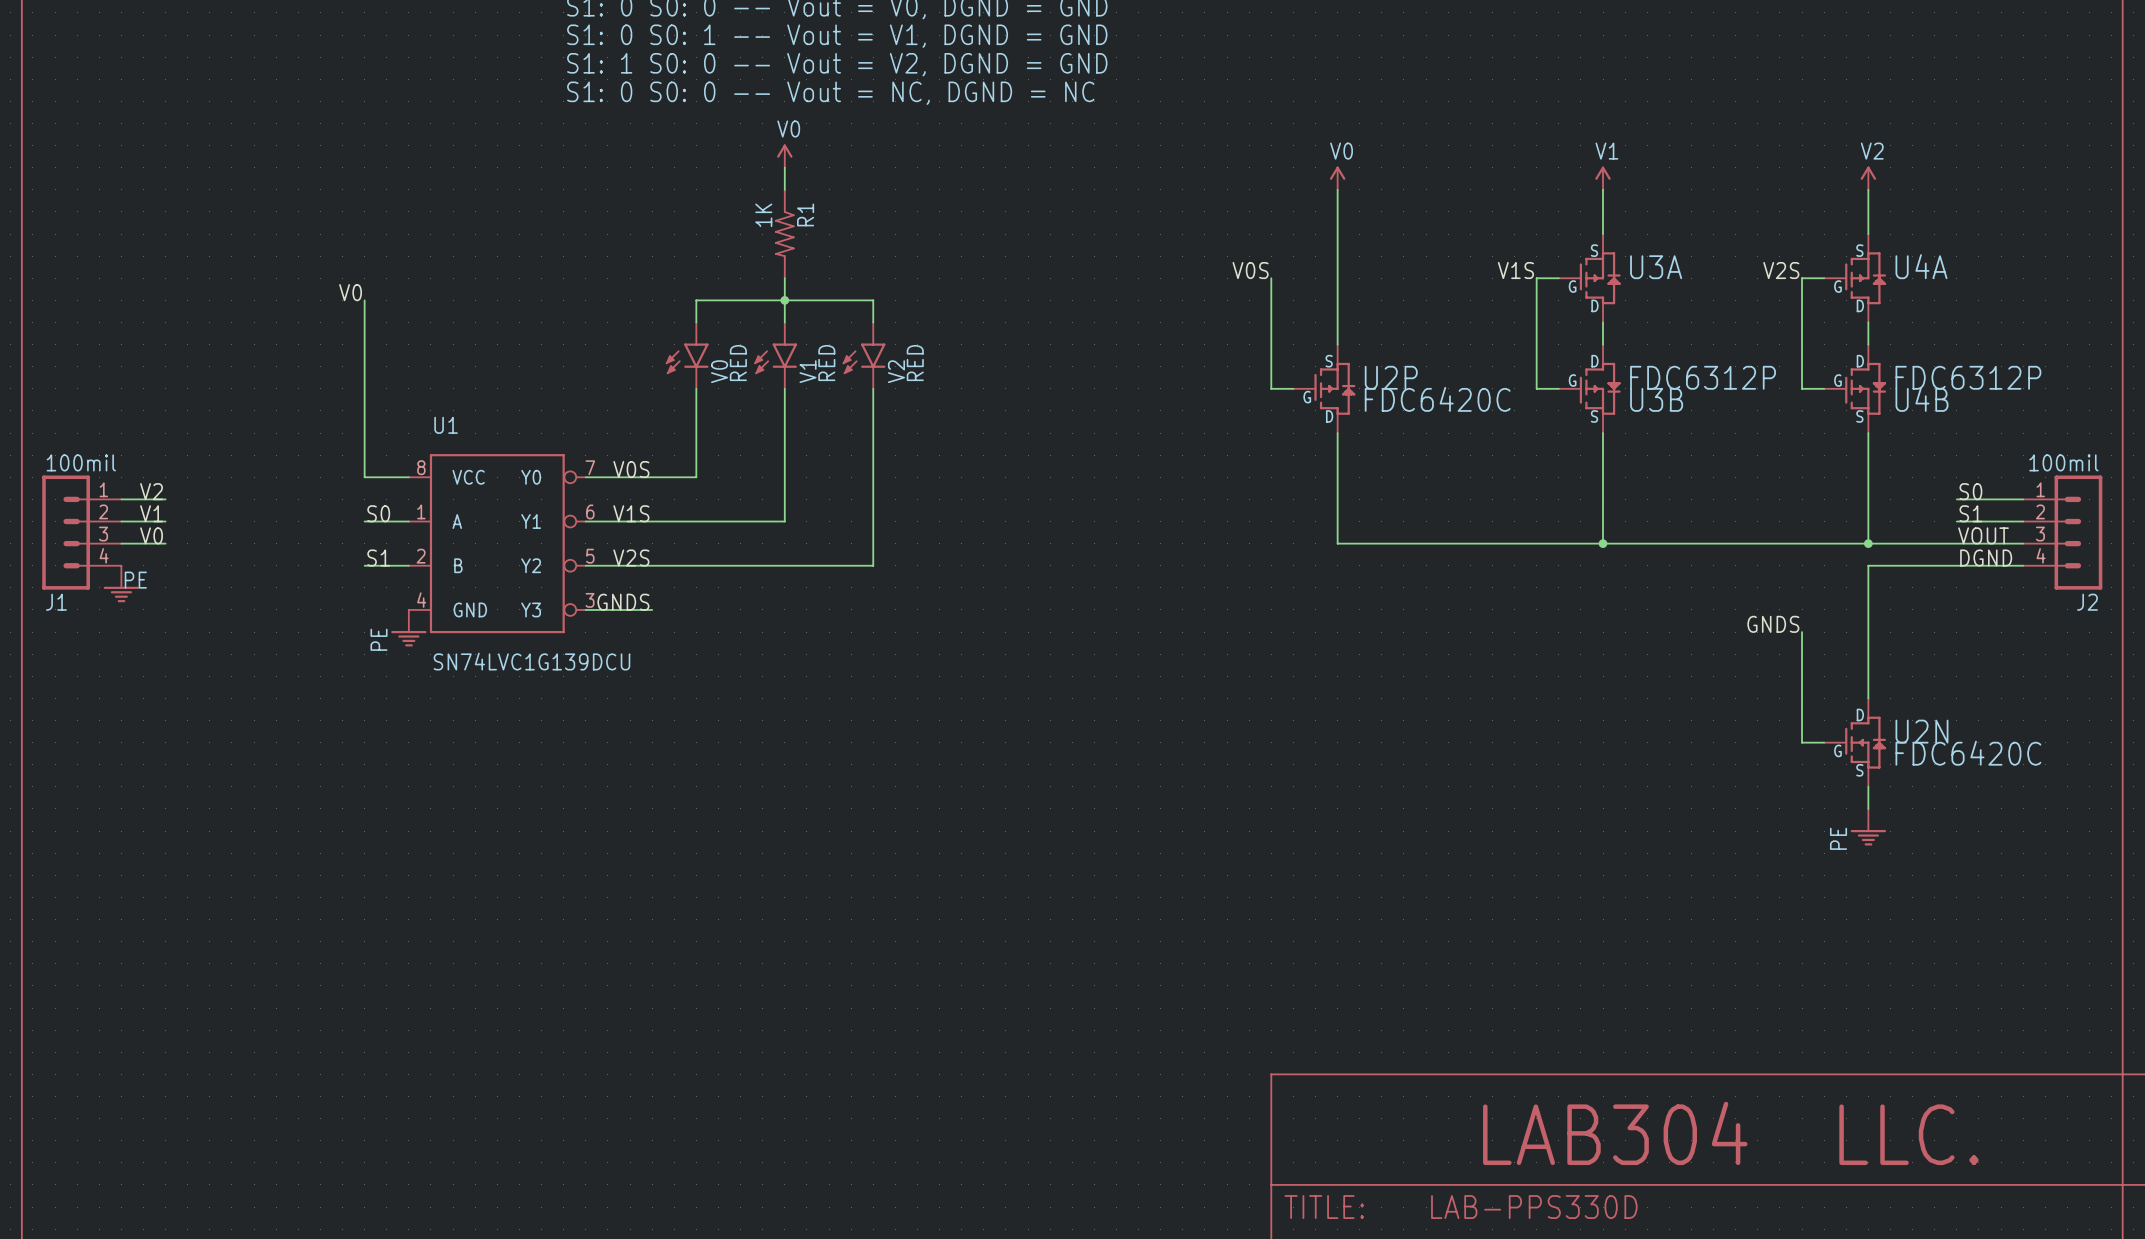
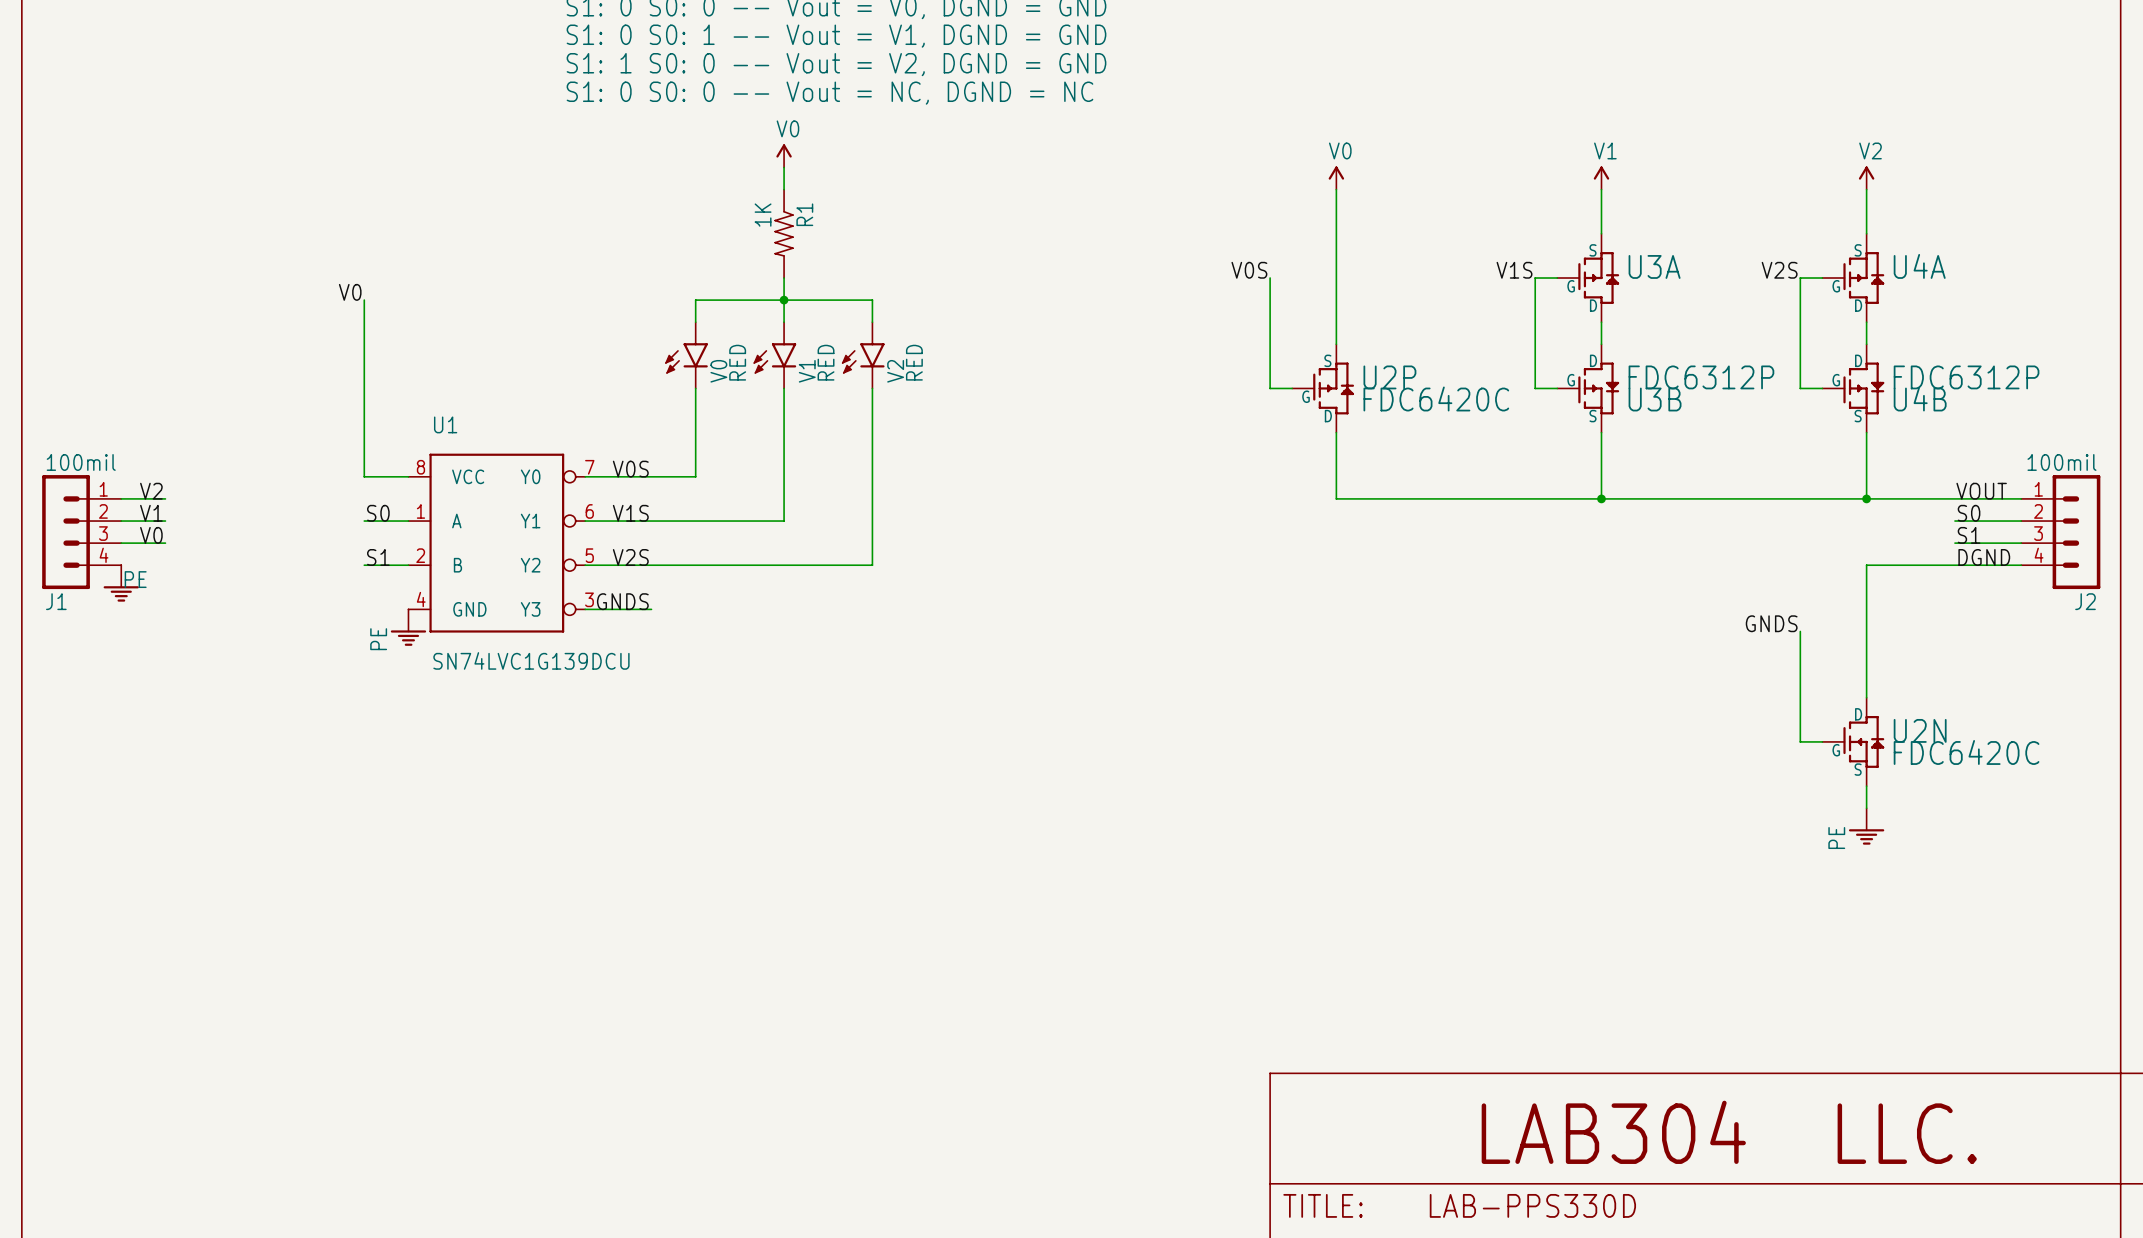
label: S0 (1970, 491) -> VOUT (1981, 491)
wire: (1337, 499) (1337, 543) (1956, 543) -> (1336, 498) (1954, 498)
wire: (1603, 499) (1603, 543) -> none
wire: (1868, 499) (1868, 543) -> none
label: S1 (1970, 513) -> S0 (1969, 513)
label: VOUT (1983, 535) -> S1 (1969, 535)
junction position: (1603, 543) -> (1601, 498)
junction position: (1868, 543) -> (1866, 498)

